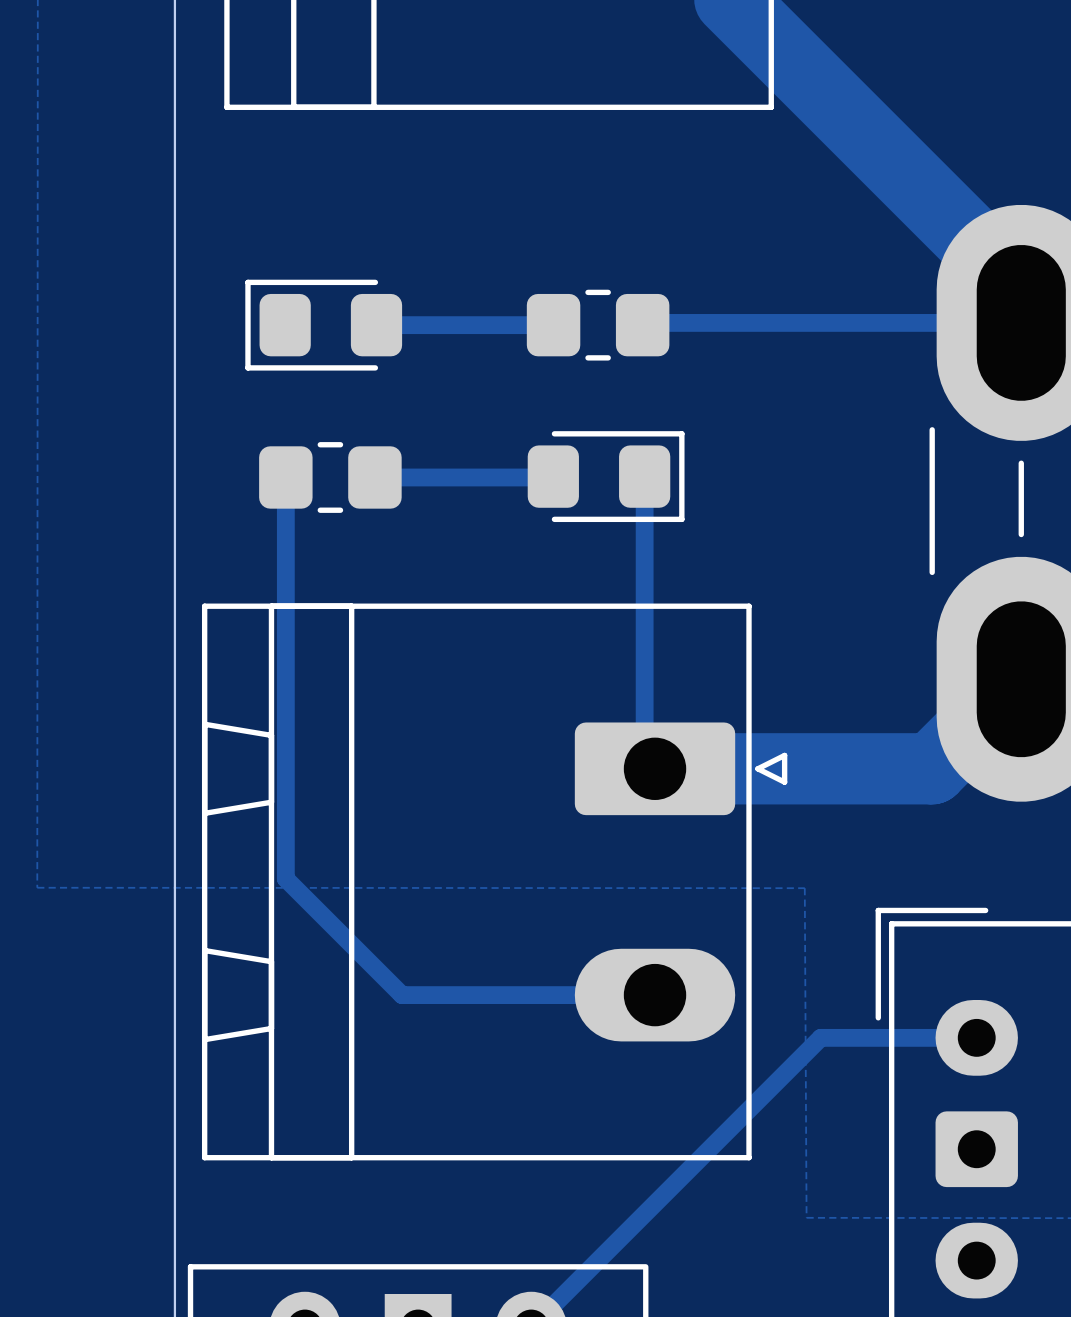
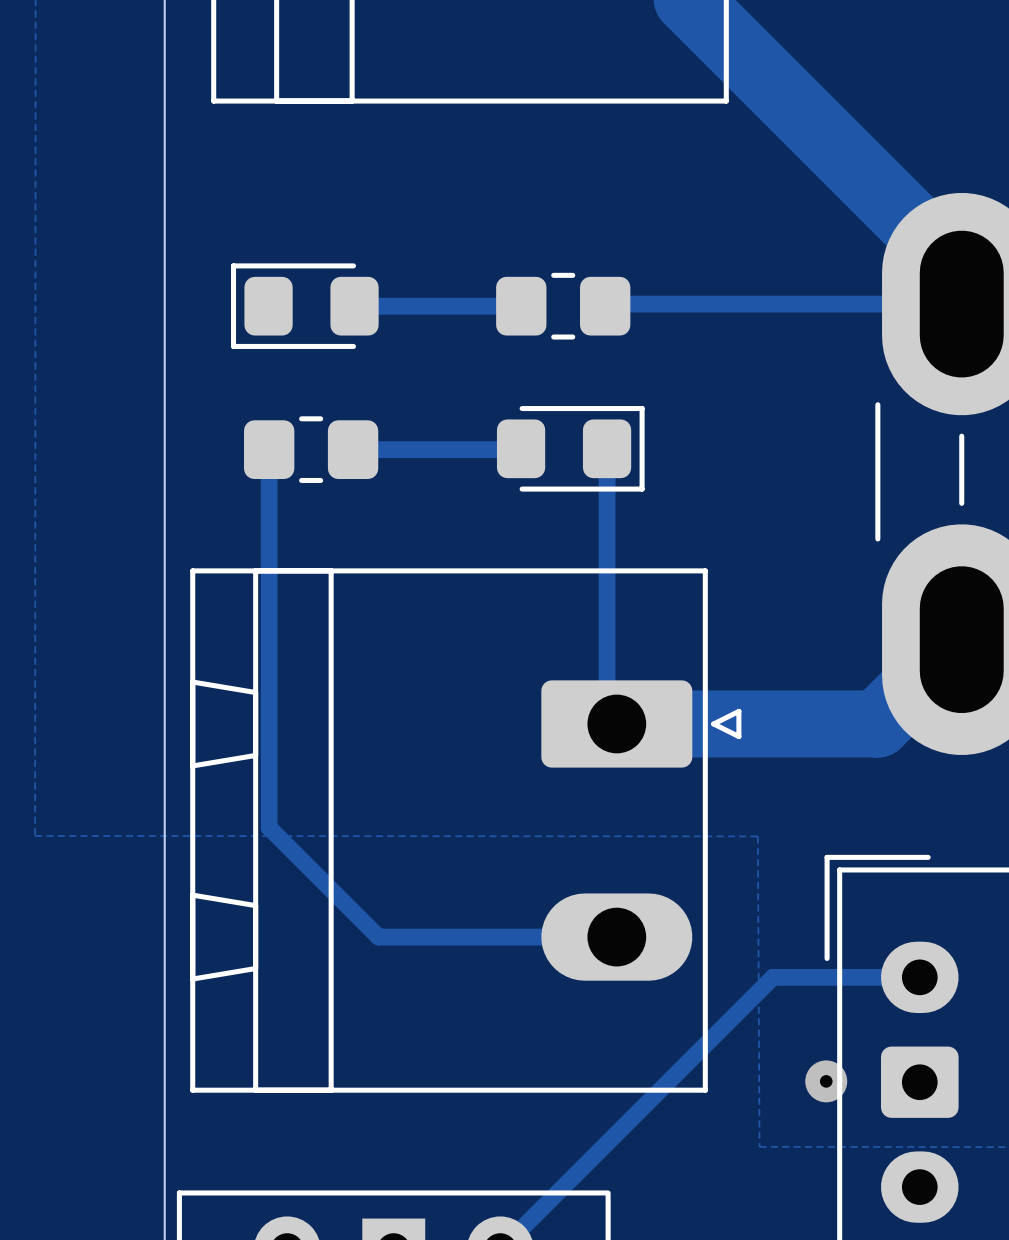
via: none -> (826, 1081)

